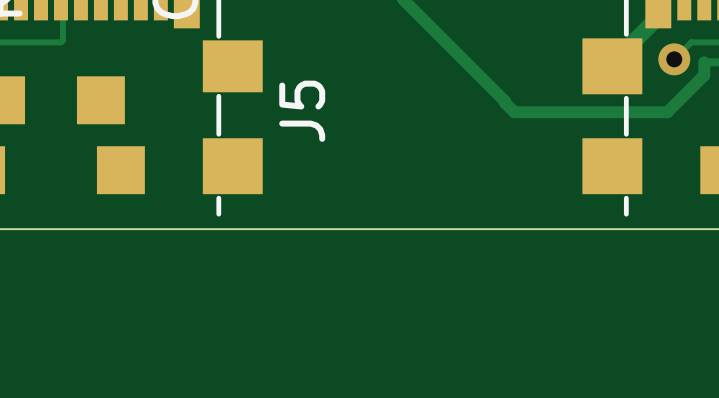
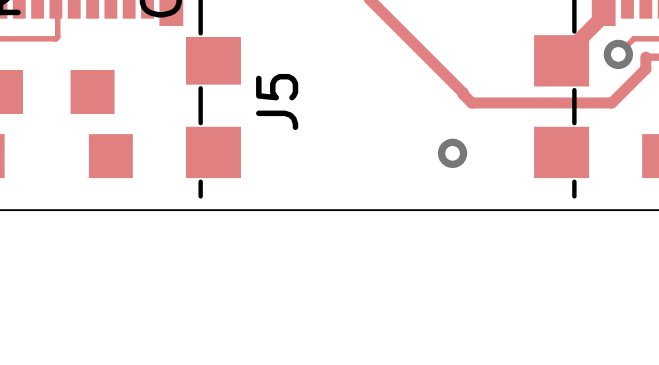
via: none -> (452, 153)

